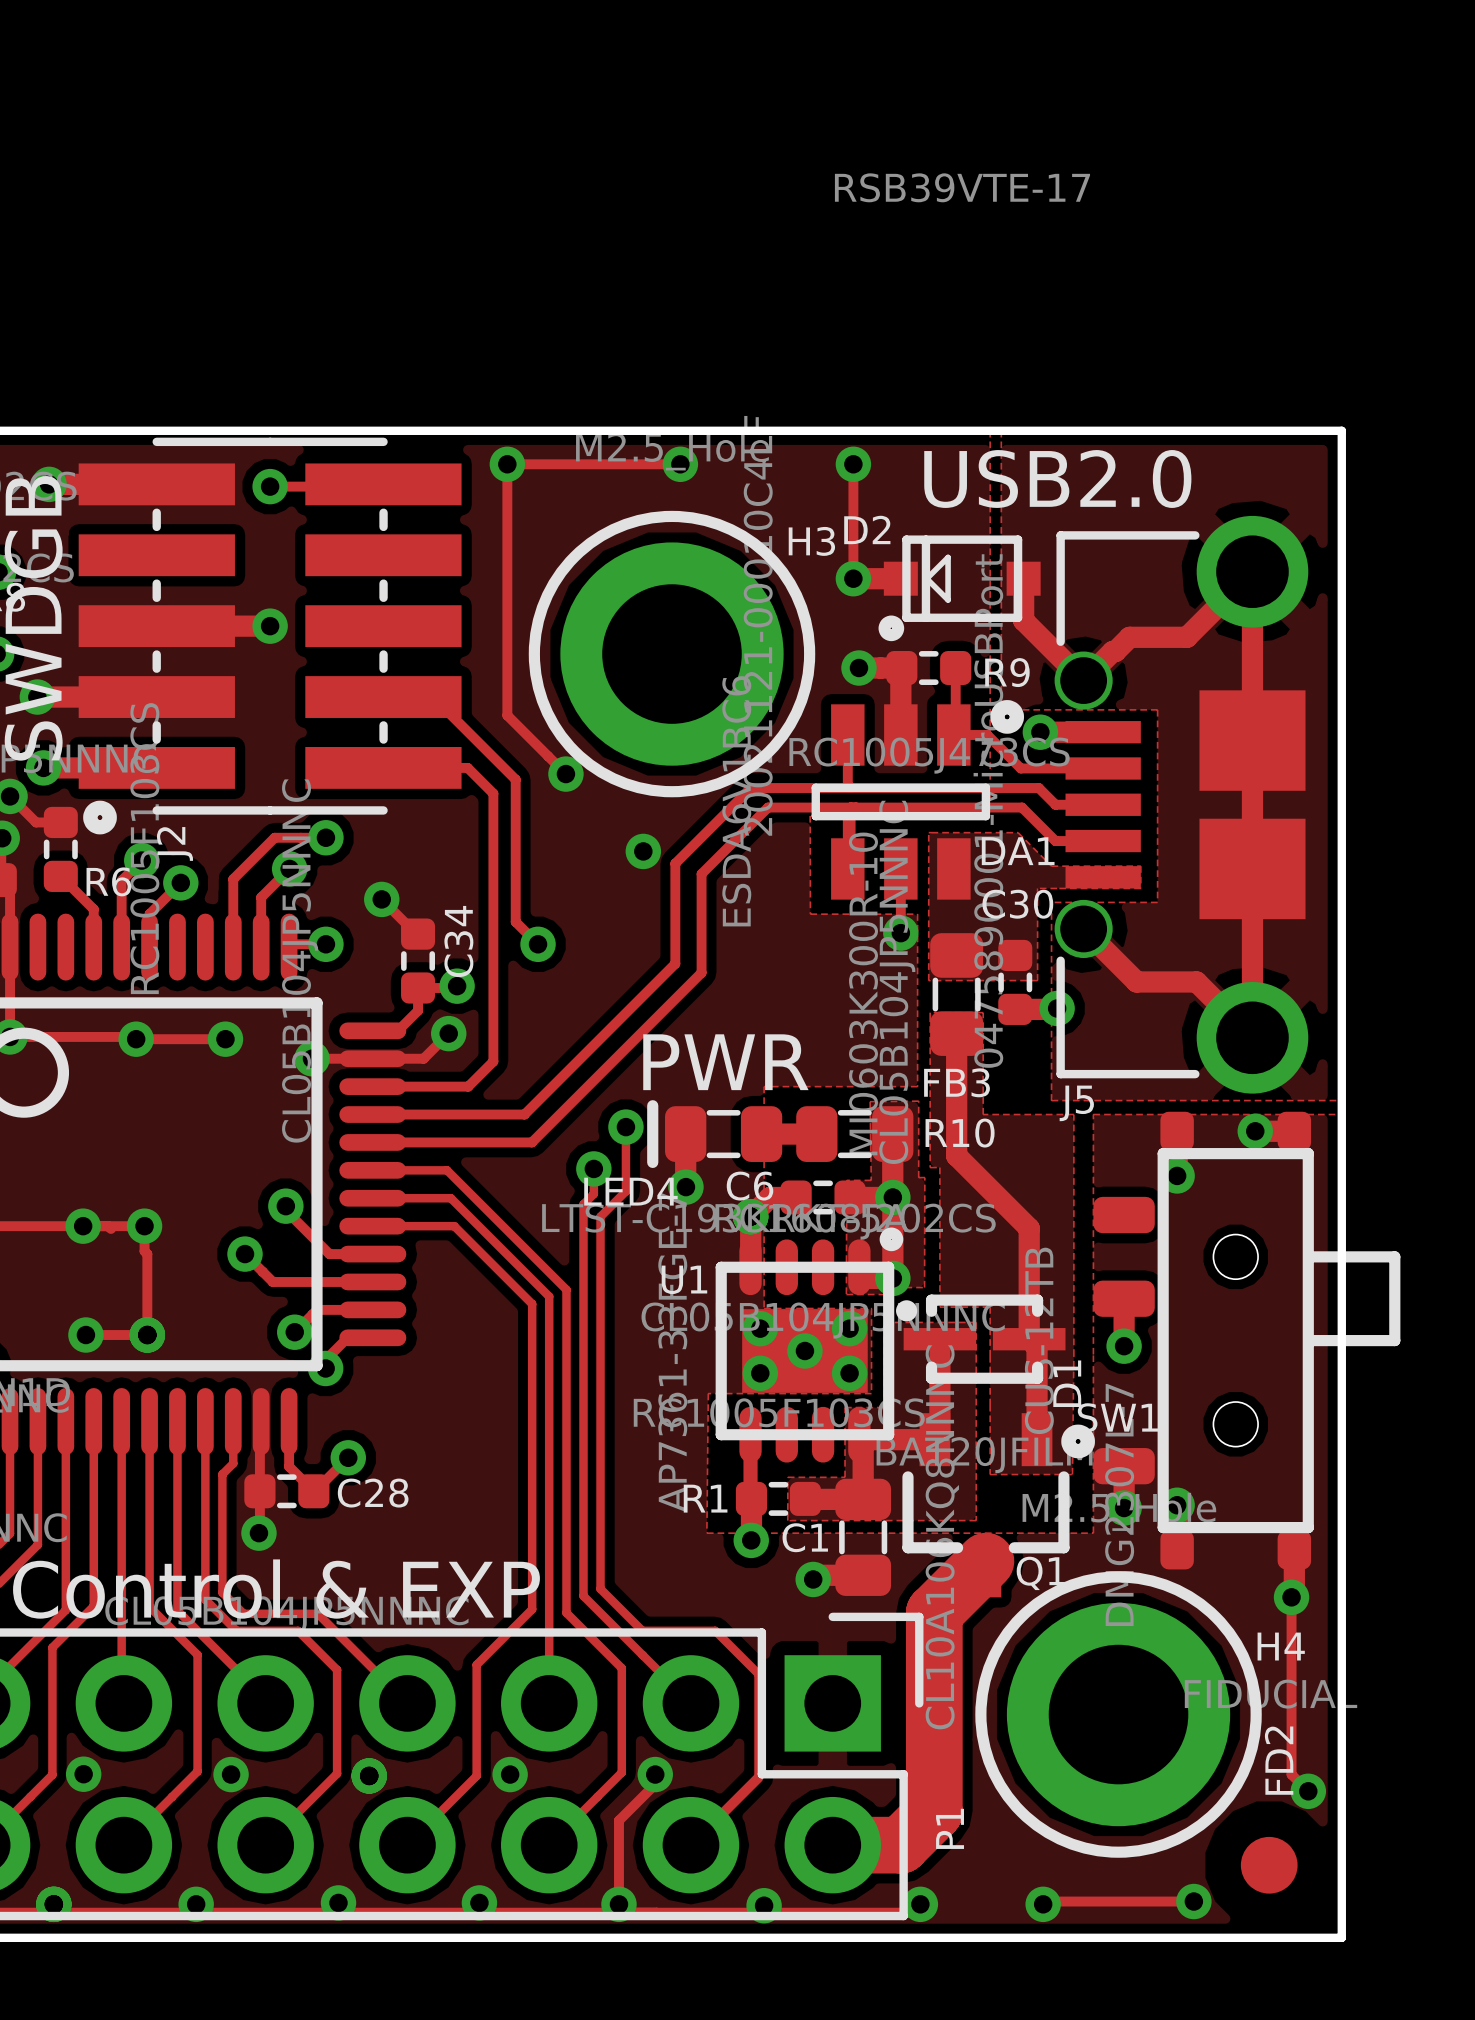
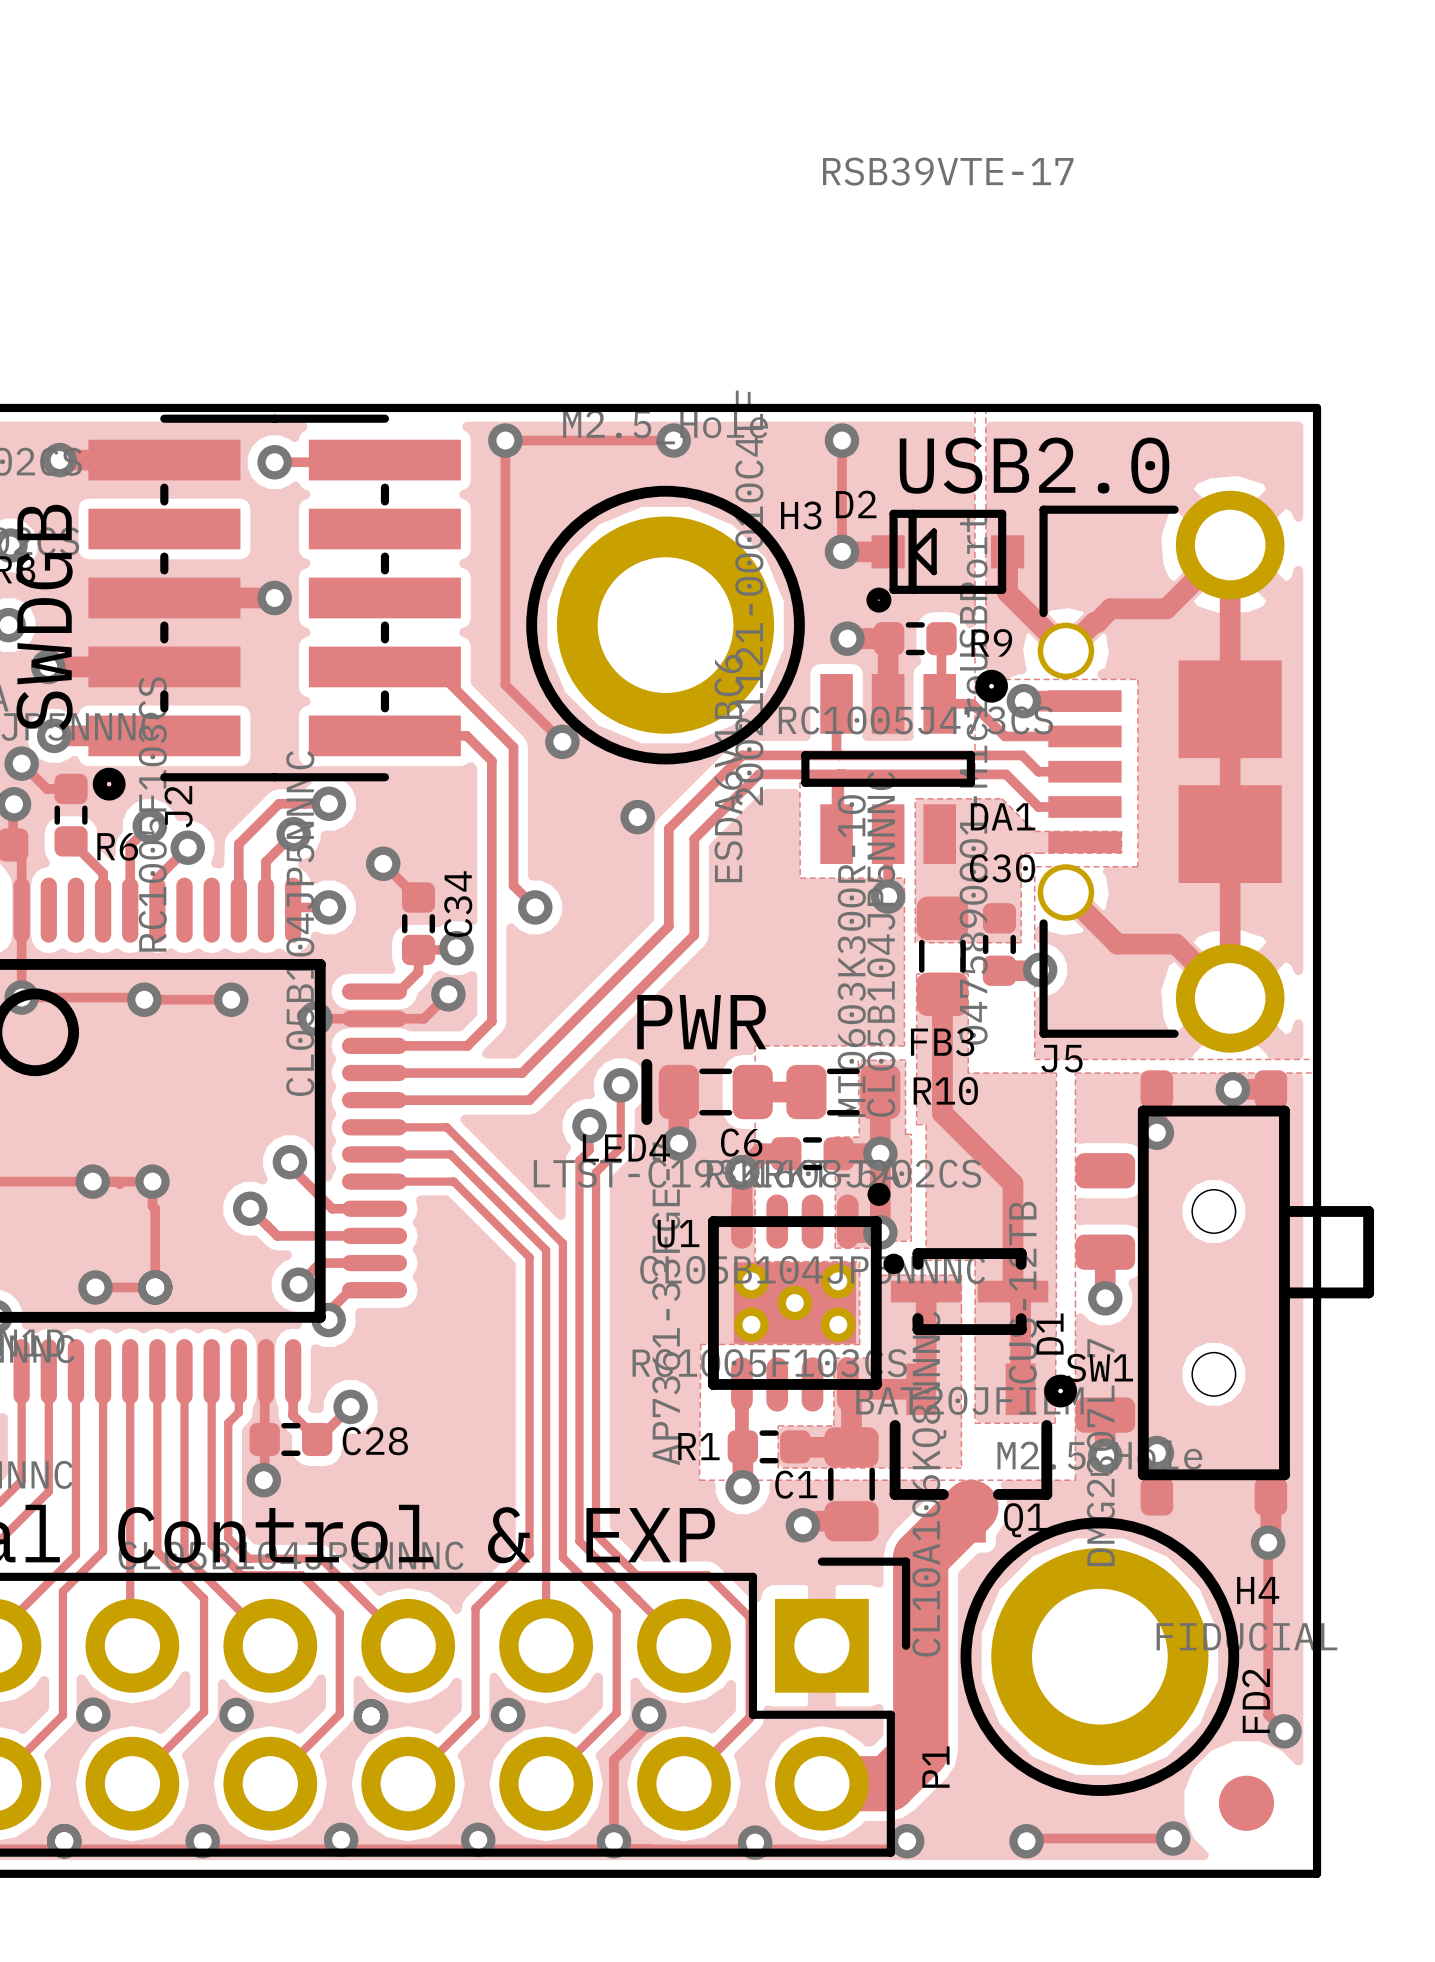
text position: USB2.0 (1057, 478) -> USB2.0 (1034, 465)

